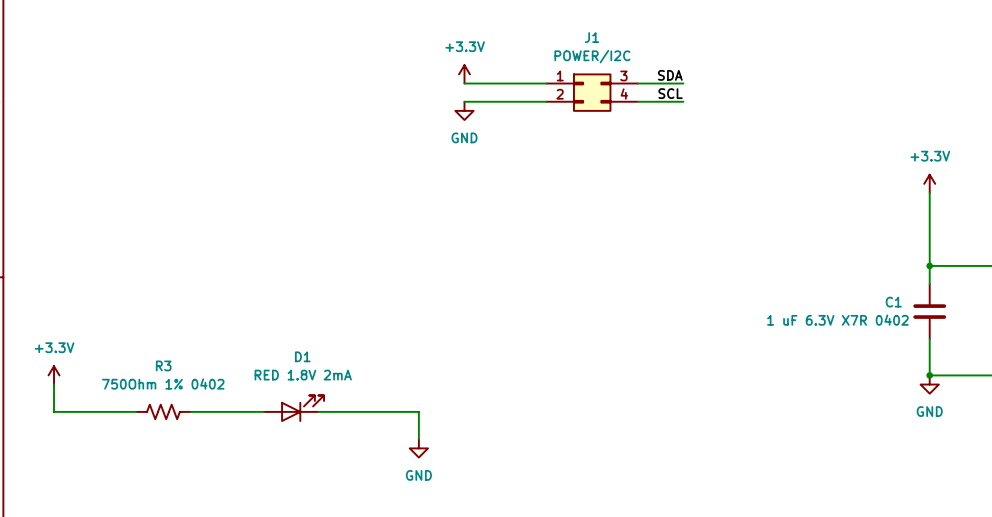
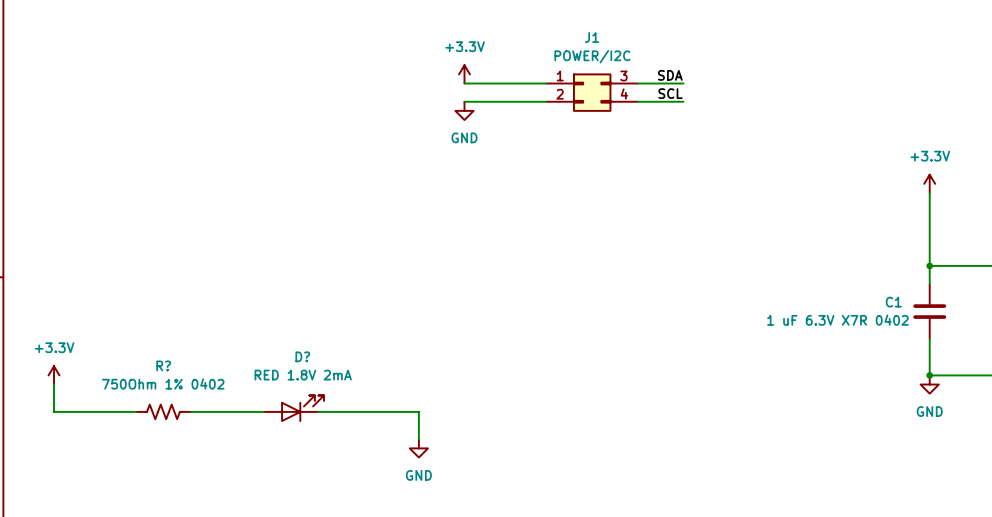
D1 name: D1 (302, 356) -> D? (302, 356)
R3 name: R3 (163, 365) -> R? (163, 365)

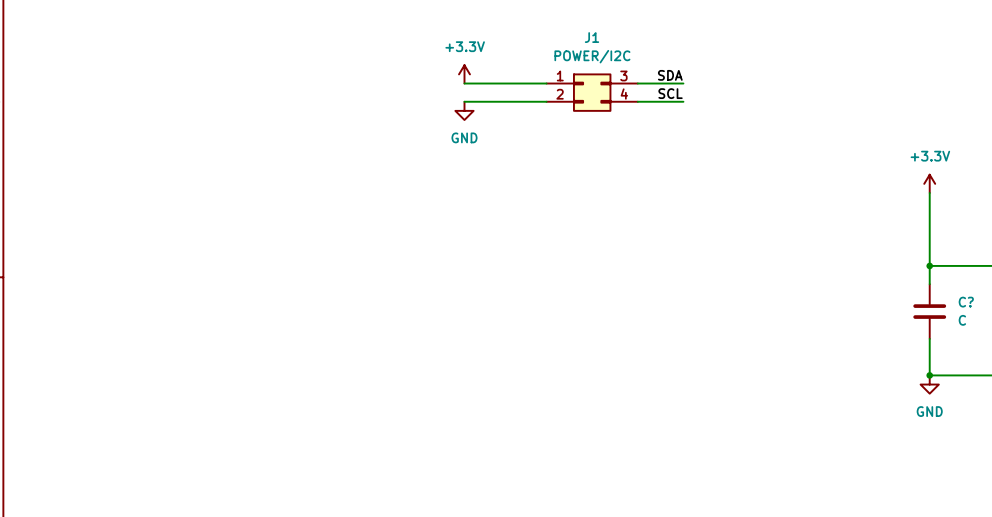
C1 name: C1 (893, 302) -> C? (966, 302)
C1 value: 1 uF 6.3V X7R 0402 (837, 320) -> C (962, 320)
power symbol: +3.3V (54, 375) -> none
wire: (54, 384) (54, 411) (136, 411) -> none
D?: RED 1.8V 2mA (293, 408) -> none
R?: 750Ohm 1% 0402 (163, 411) -> none
wire: (190, 411) (263, 411) -> none
wire: (318, 411) (418, 411) (418, 439) -> none
power symbol: GND (418, 448) -> none

